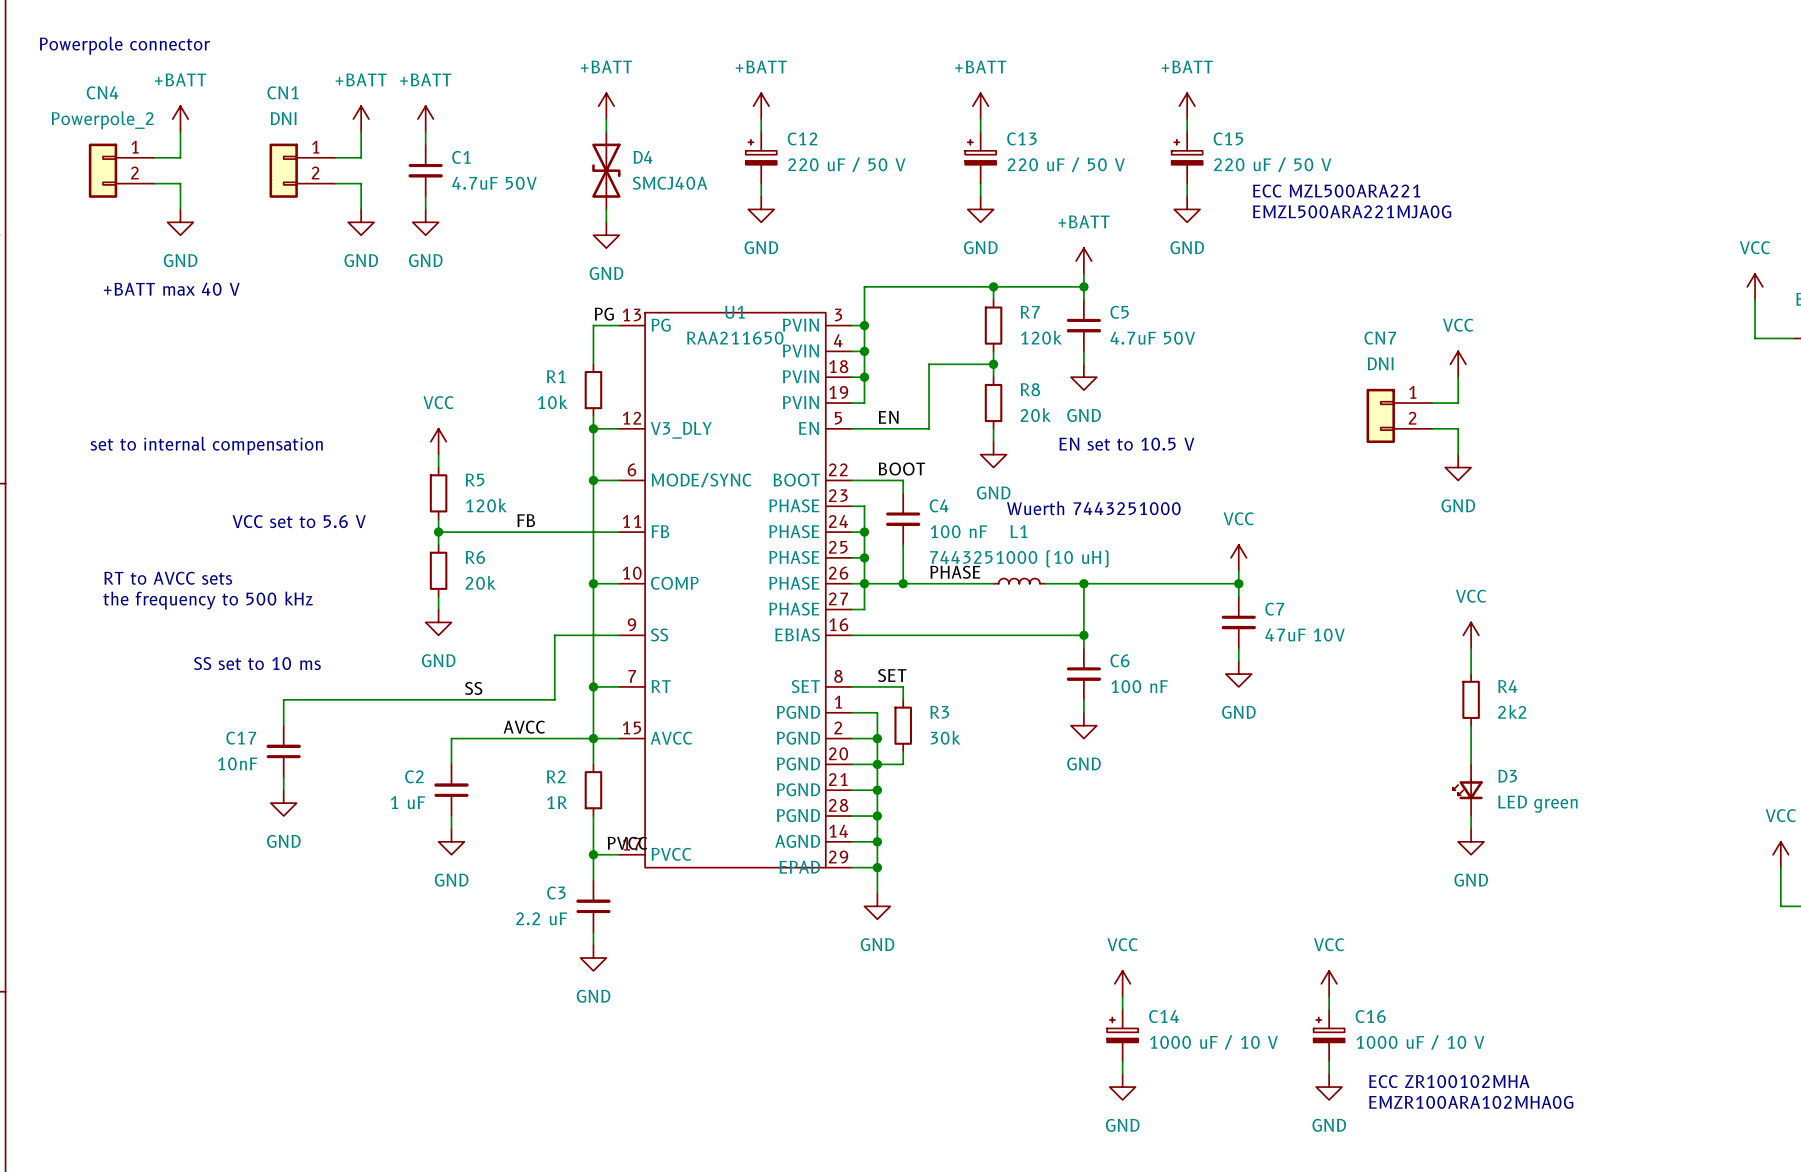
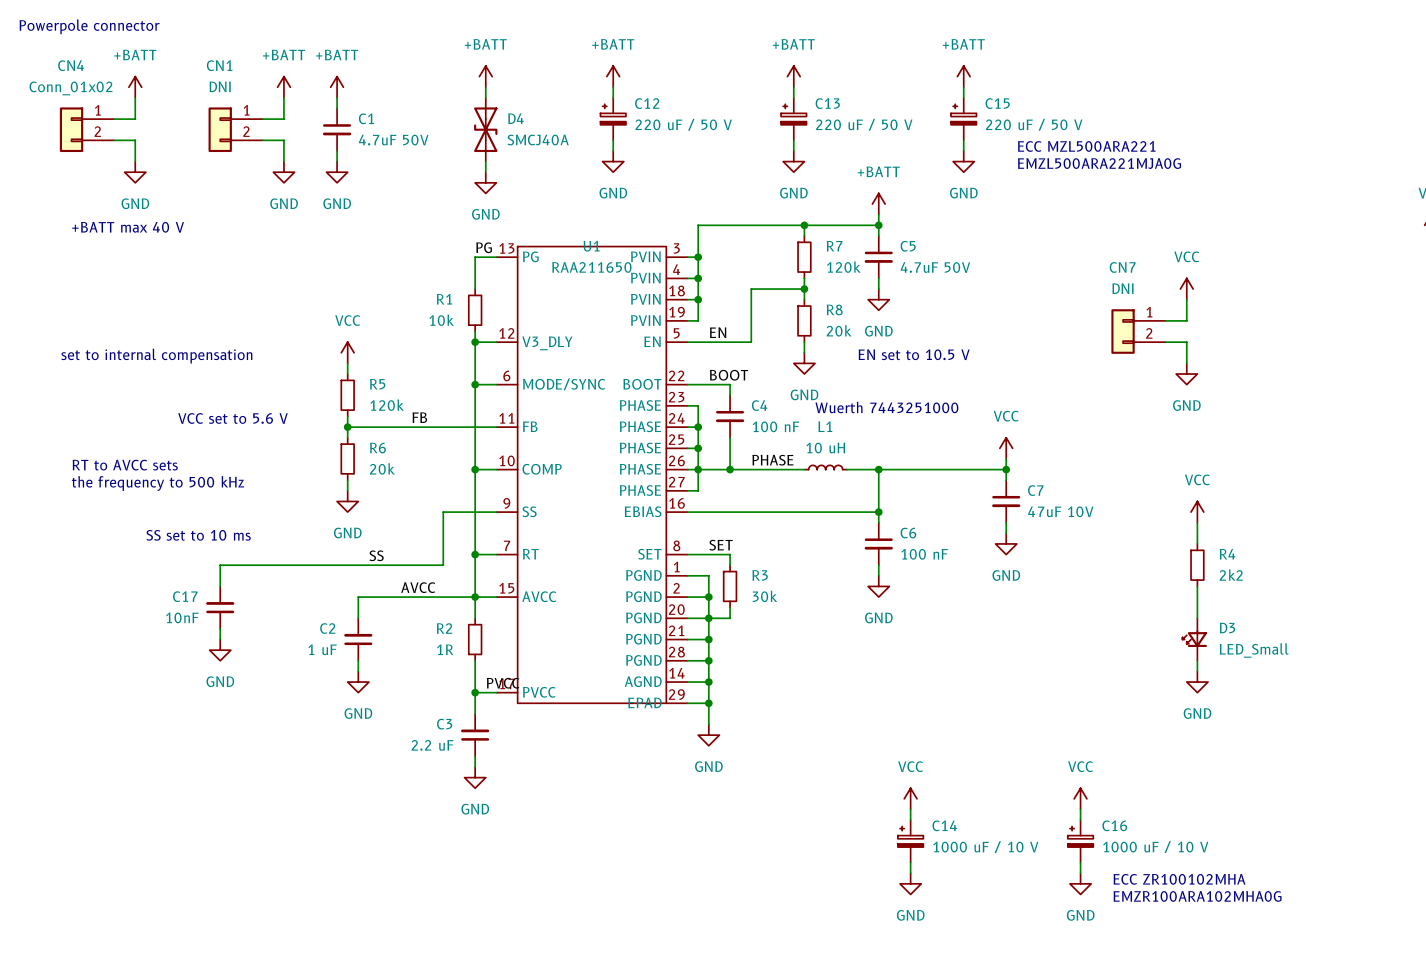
CN4 value: Powerpole_2 (102, 120) -> Conn_01x02 (70, 88)
L1 value: 7443251000 (10 uH) (1019, 558) -> 10 uH (825, 448)
D3 value: LED green (1537, 804) -> LED_Small (1254, 650)

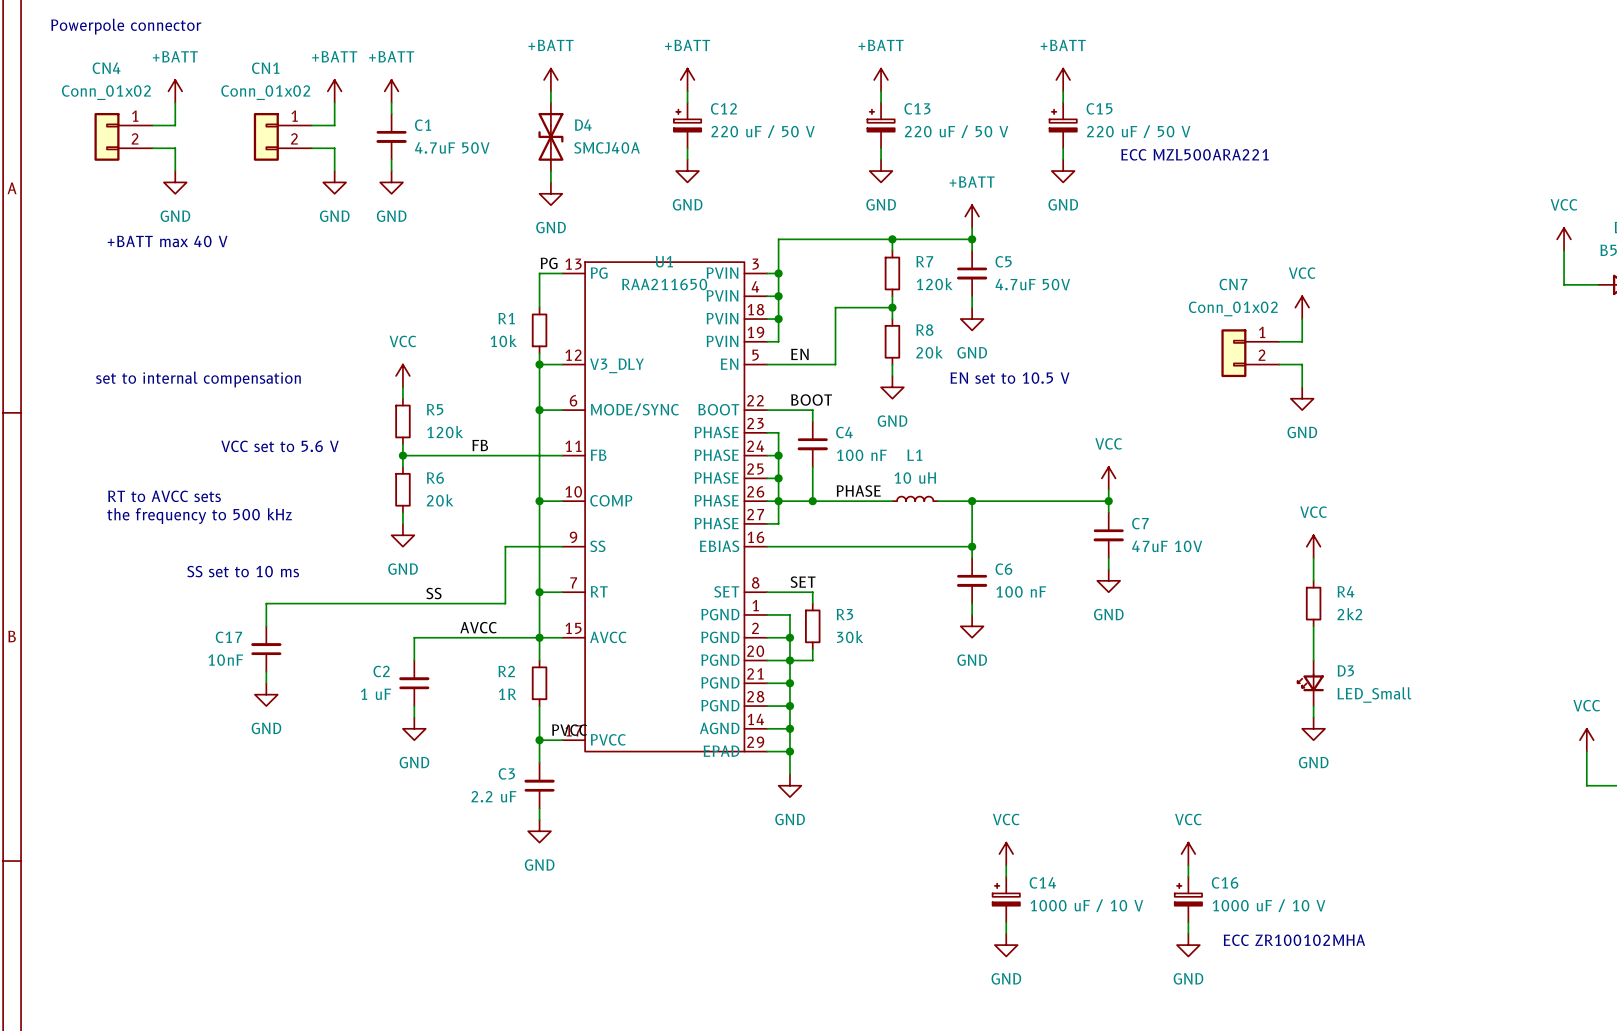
CN1 value: DNI (220, 86) -> Conn_01x02 (265, 92)
text: EMZL500ARA221MJA0G (1099, 163) -> none
CN7 value: DNI (1122, 288) -> Conn_01x02 (1233, 308)
text: Wuerth 7443251000 (886, 407) -> none
text: EMZR100ARA102MHA0G (1197, 896) -> none

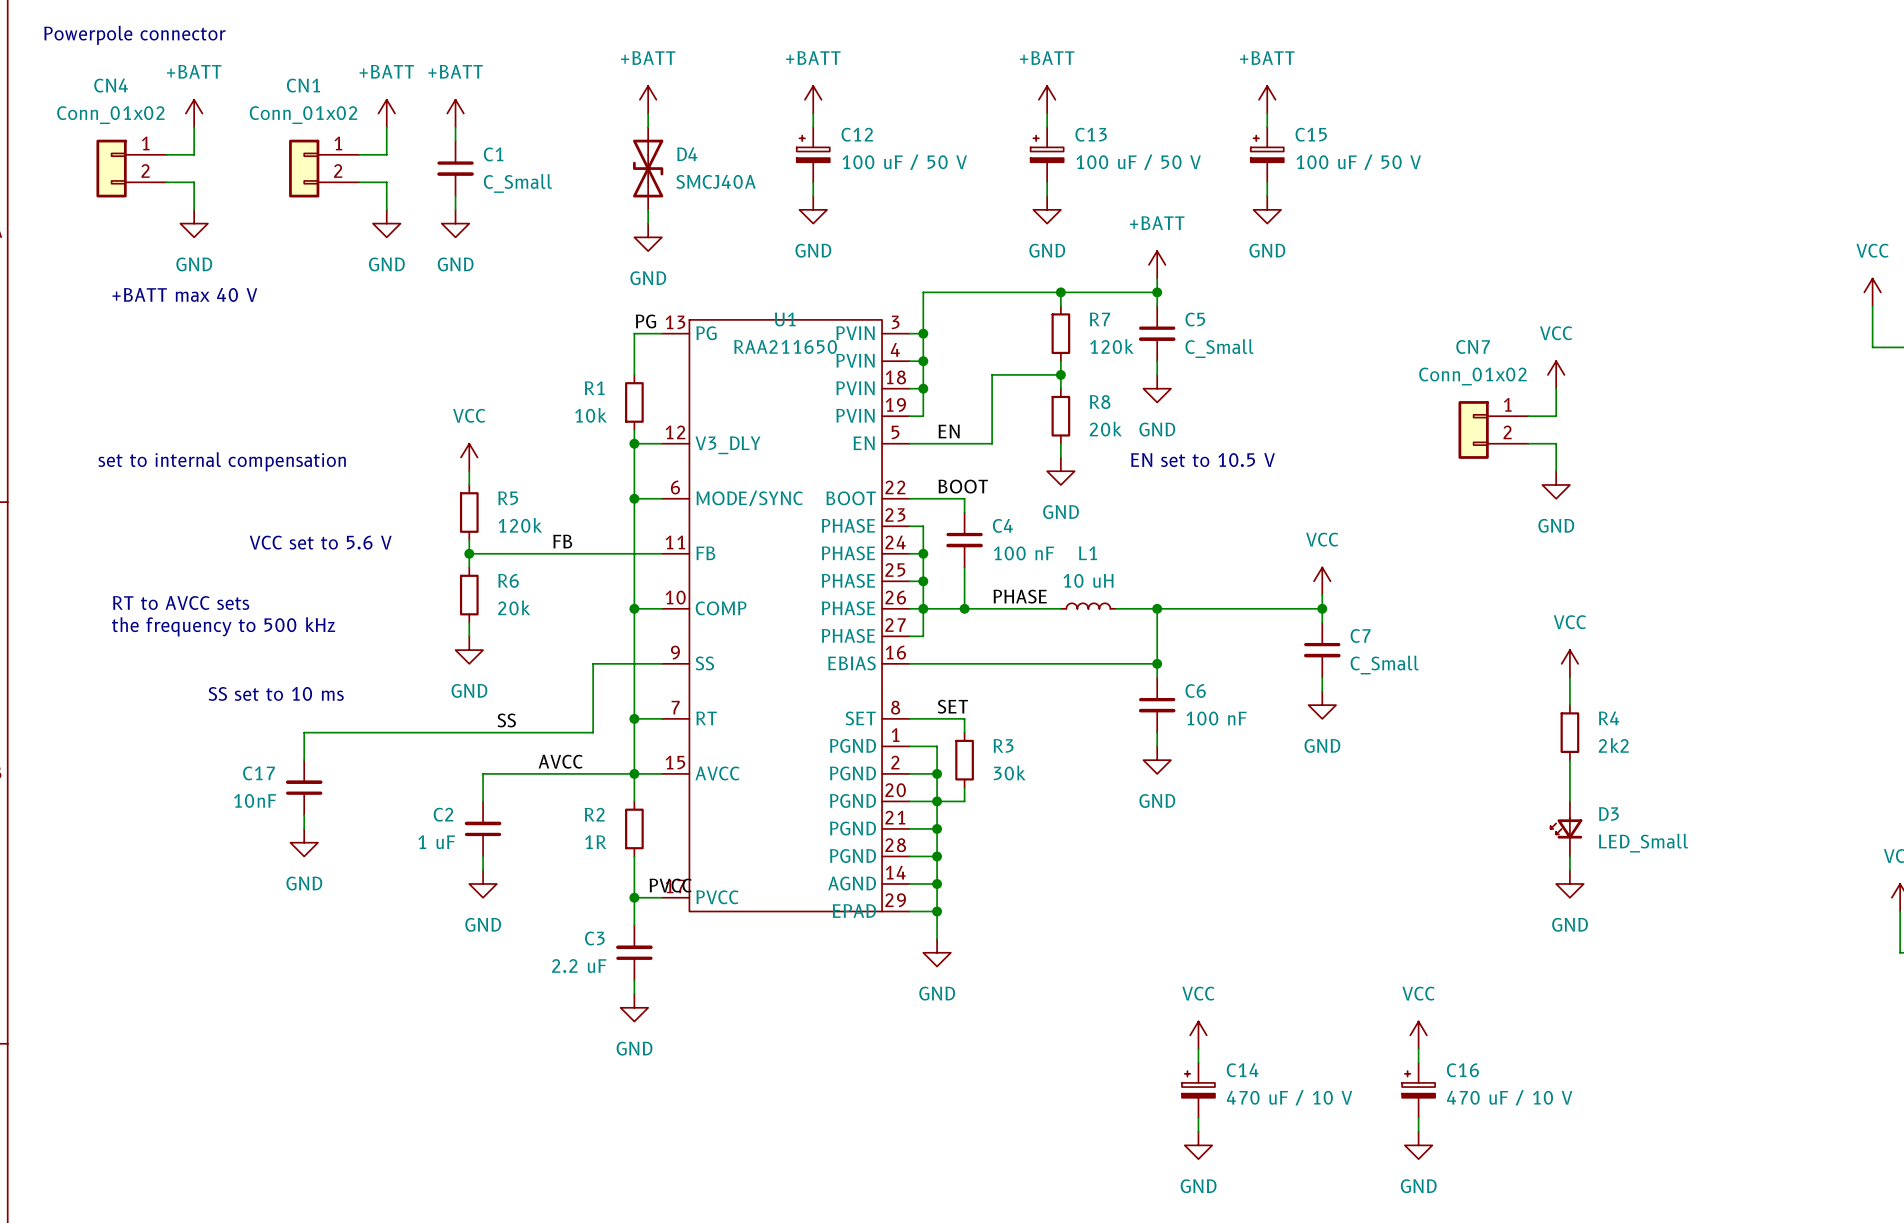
C12 value: 220 uF / 50 V (763, 131) -> 100 uF / 50 V (904, 162)
C13 value: 220 uF / 50 V (956, 131) -> 100 uF / 50 V (1138, 162)
C15 value: 220 uF / 50 V (1138, 131) -> 100 uF / 50 V (1358, 162)
C1 value: 4.7uF 50V (452, 147) -> C_Small (517, 183)
text: ECC MZL500ARA221 (1195, 154) -> none
C5 value: 4.7uF 50V (1032, 284) -> C_Small (1219, 348)
C7 value: 47uF 10V (1167, 546) -> C_Small (1384, 665)
C14 value: 1000 uF / 10 V (1086, 905) -> 470 uF / 10 V (1289, 1097)
C16 value: 1000 uF / 10 V (1268, 905) -> 470 uF / 10 V (1509, 1097)
text: ECC ZR100102MHA (1294, 940) -> none

